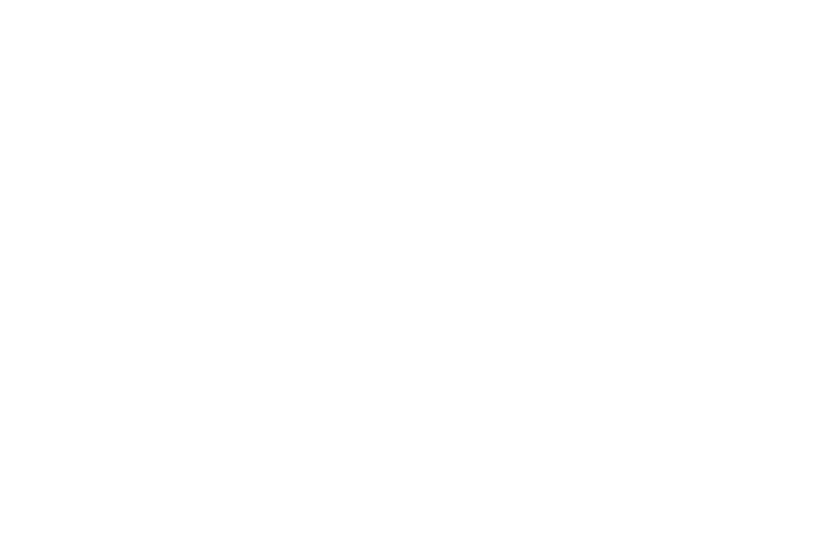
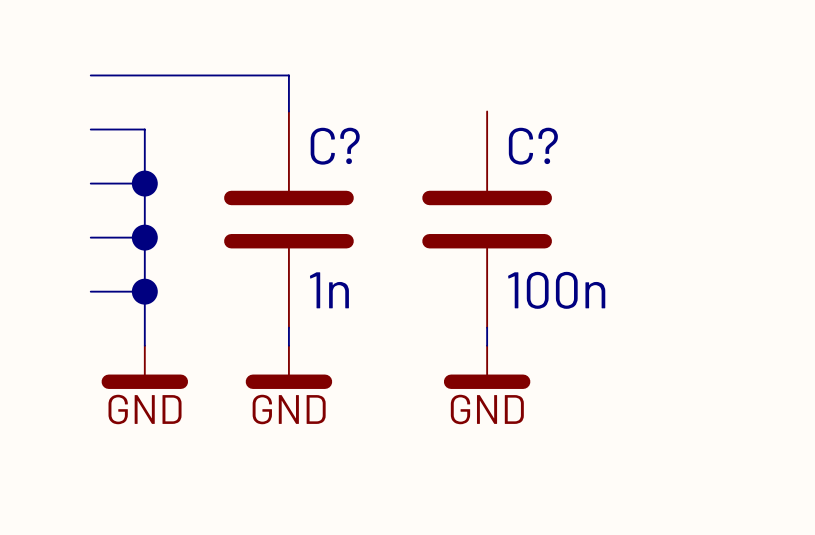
wire: none -> (90, 75) (288, 75) (288, 111)
wire: none -> (90, 129) (144, 129) (144, 345)
wire: none -> (90, 183) (144, 183)
junction: none -> (144, 183)
C?: none -> 1n (288, 219)
C?: none -> 100n (487, 219)
wire: none -> (90, 237) (144, 237)
junction: none -> (144, 237)
wire: none -> (90, 291) (144, 291)
junction: none -> (144, 291)
wire: none -> (288, 327) (288, 345)
wire: none -> (487, 327) (487, 345)
power symbol: none -> (144, 367)
power symbol: none -> (288, 367)
power symbol: none -> (487, 367)

